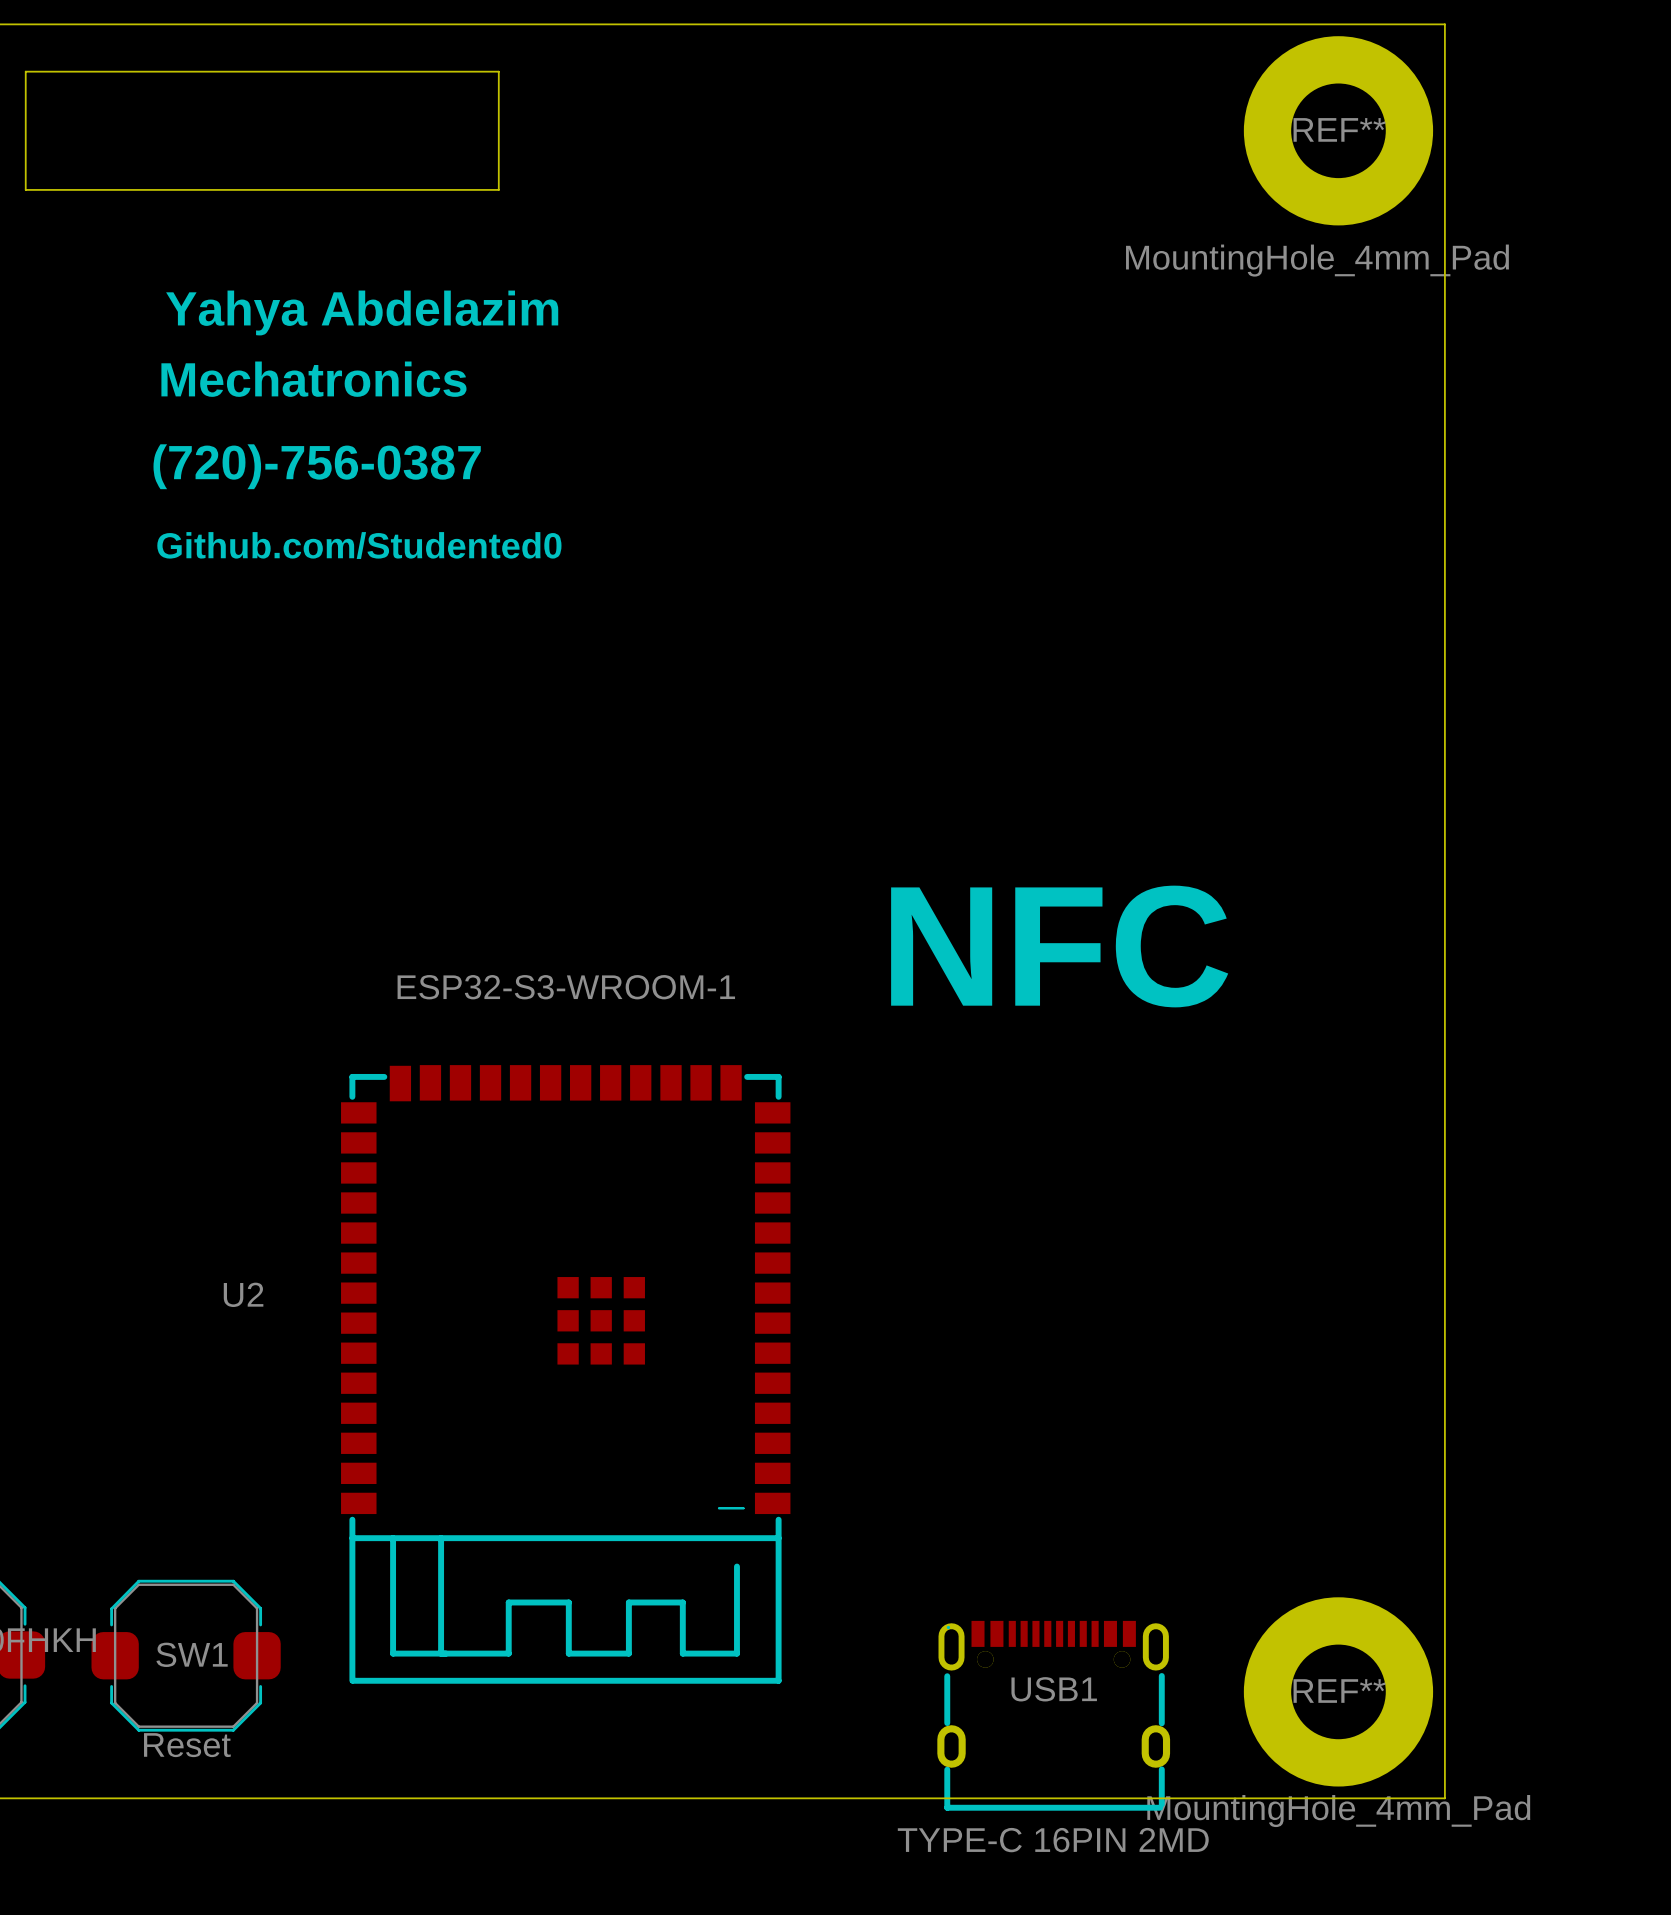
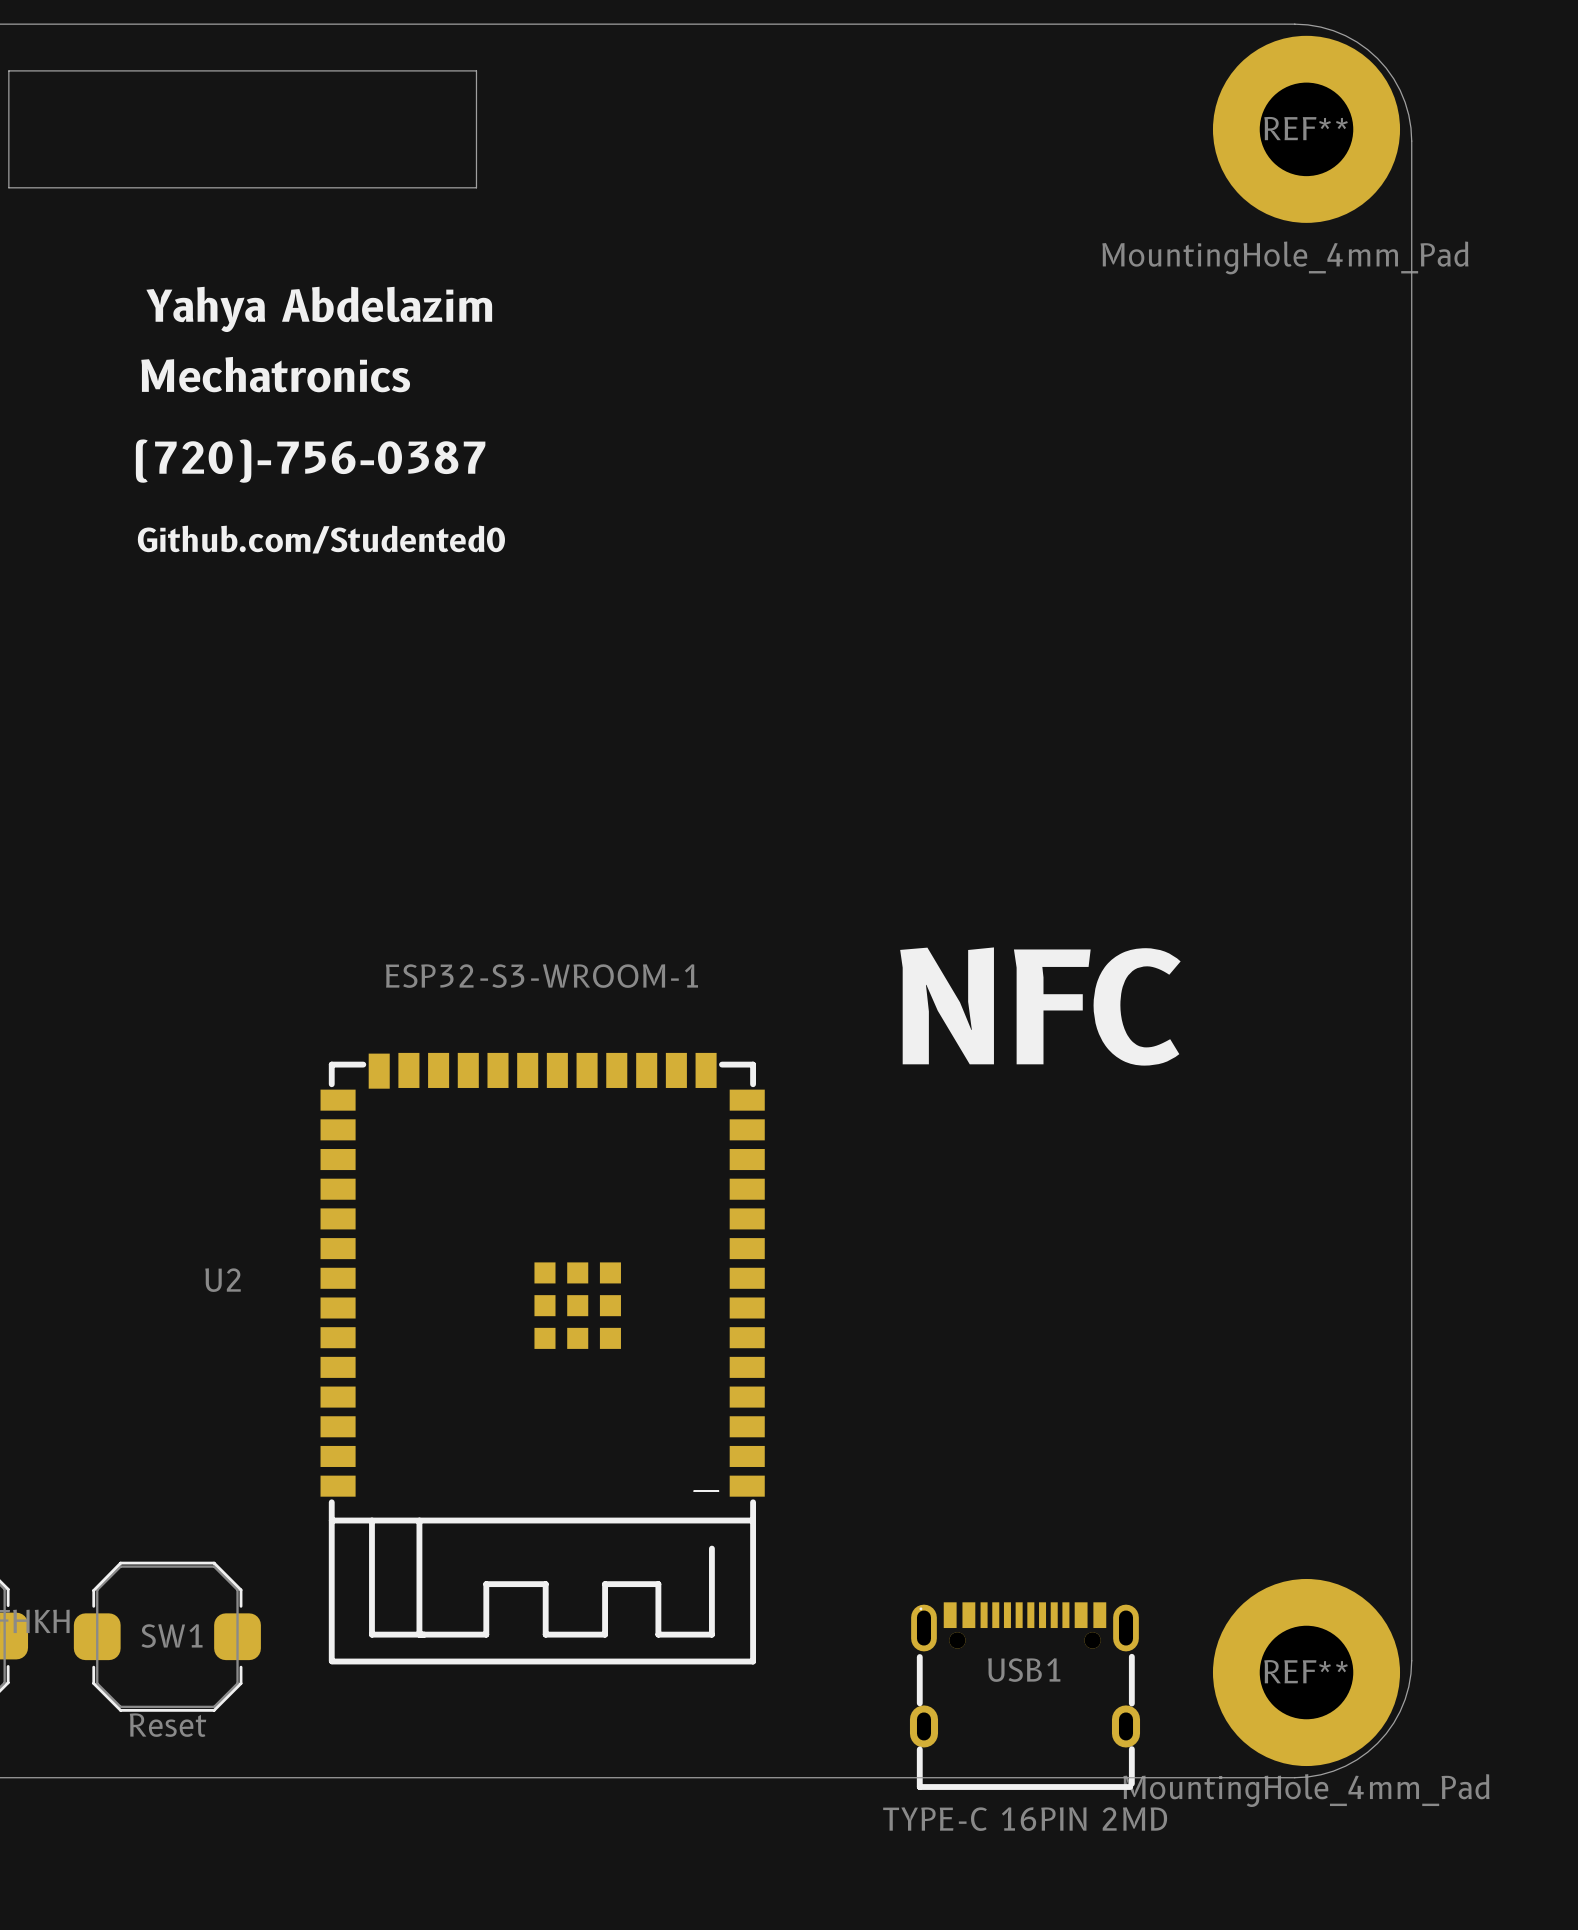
board edge: (1326, 24) (1444, 24) (1444, 142) -> (1294, 24) (1333, 30) (1357, 42) (1377, 58) (1400, 90) (1408, 115) (1411, 141)
text position: NFC (1059, 946) -> NFC (1040, 1006)
board edge: (1444, 1680) (1444, 1798) (1326, 1798) -> (1411, 1660) (1405, 1699) (1393, 1723) (1377, 1743) (1345, 1766) (1320, 1774) (1294, 1777)

